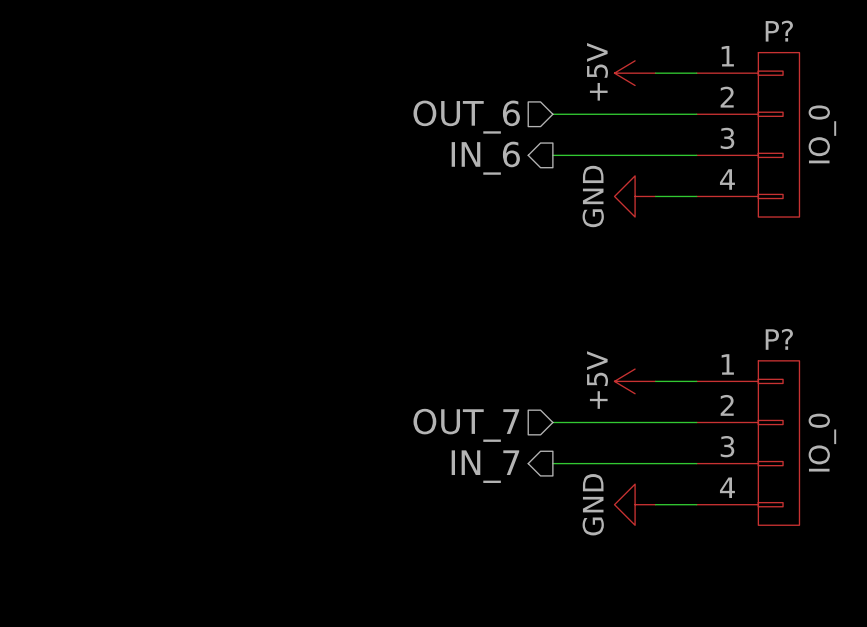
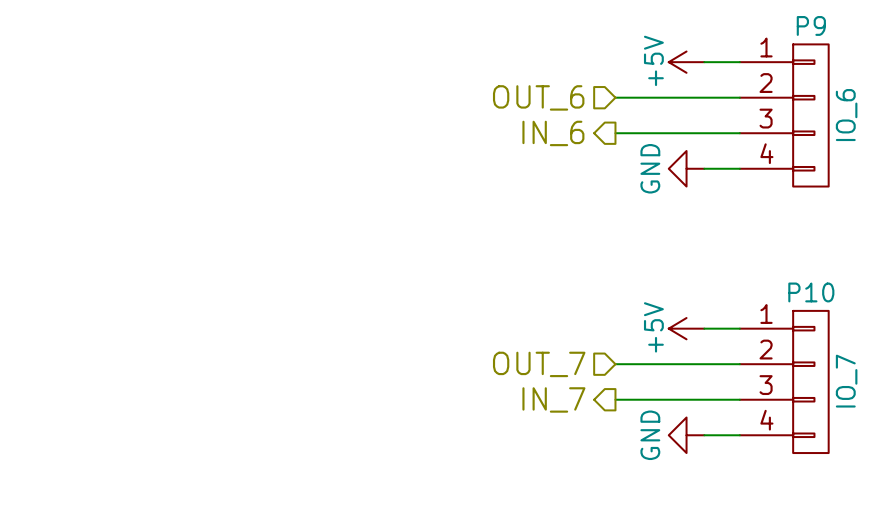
P? name: P? (779, 31) -> P9 (811, 25)
P? value: IO_0 (822, 134) -> IO_6 (846, 115)
P? name: P? (779, 339) -> P10 (811, 292)
P? value: IO_0 (822, 442) -> IO_7 (846, 381)

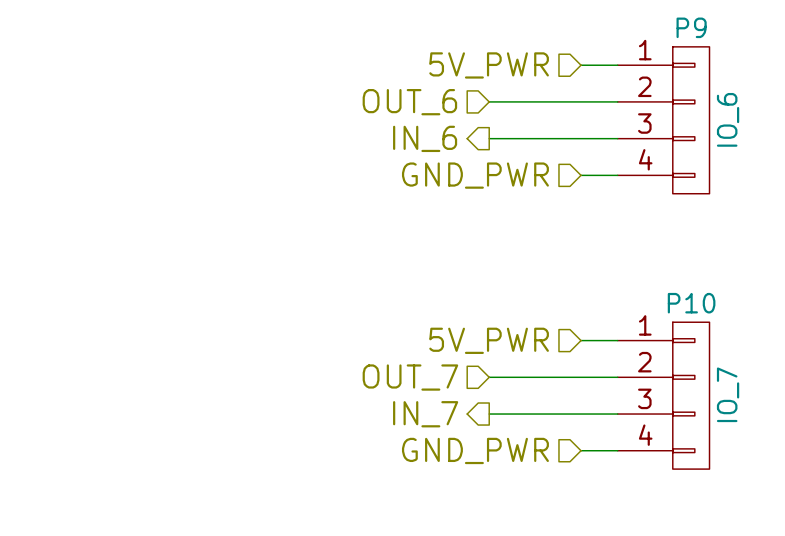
hierarchical label: none -> 5V_PWR (489, 65)
power symbol: +5V (686, 62) -> none
hierarchical label: none -> GND_PWR (475, 175)
power symbol: GND (686, 168) -> none
hierarchical label: none -> 5V_PWR (489, 340)
power symbol: +5V (686, 328) -> none
hierarchical label: none -> GND_PWR (475, 450)
power symbol: GND (686, 435) -> none

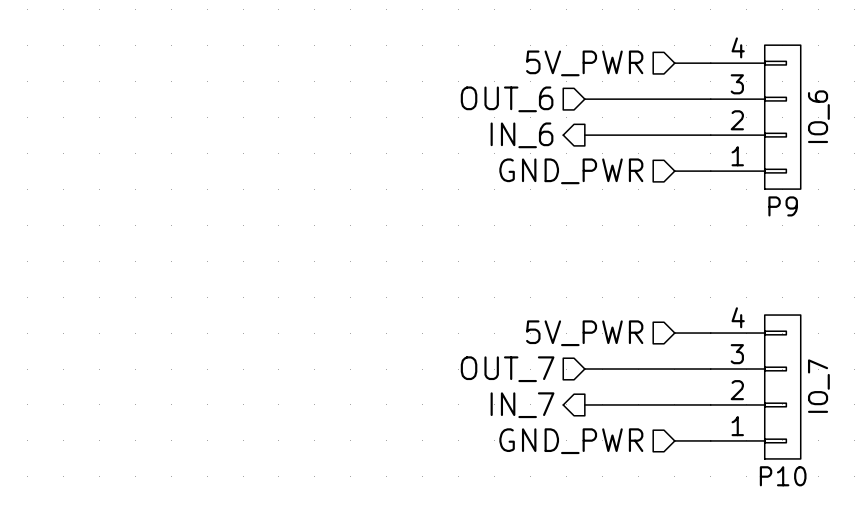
P9 flip: as is (691, 120) -> up-down (782, 117)
P10 flip: as is (691, 395) -> up-down (782, 386)

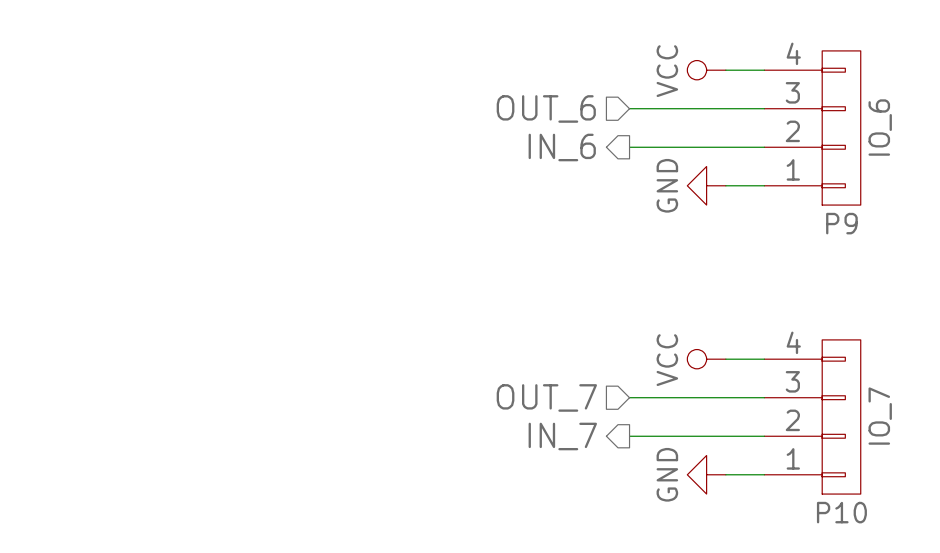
hierarchical label: 5V_PWR (584, 63) -> none
power symbol: none -> VCC (706, 70)
hierarchical label: GND_PWR (571, 171) -> none
power symbol: none -> GND (706, 185)
hierarchical label: 5V_PWR (584, 333) -> none
power symbol: none -> VCC (706, 359)
power symbol: none -> GND (706, 474)
hierarchical label: GND_PWR (571, 441) -> none

